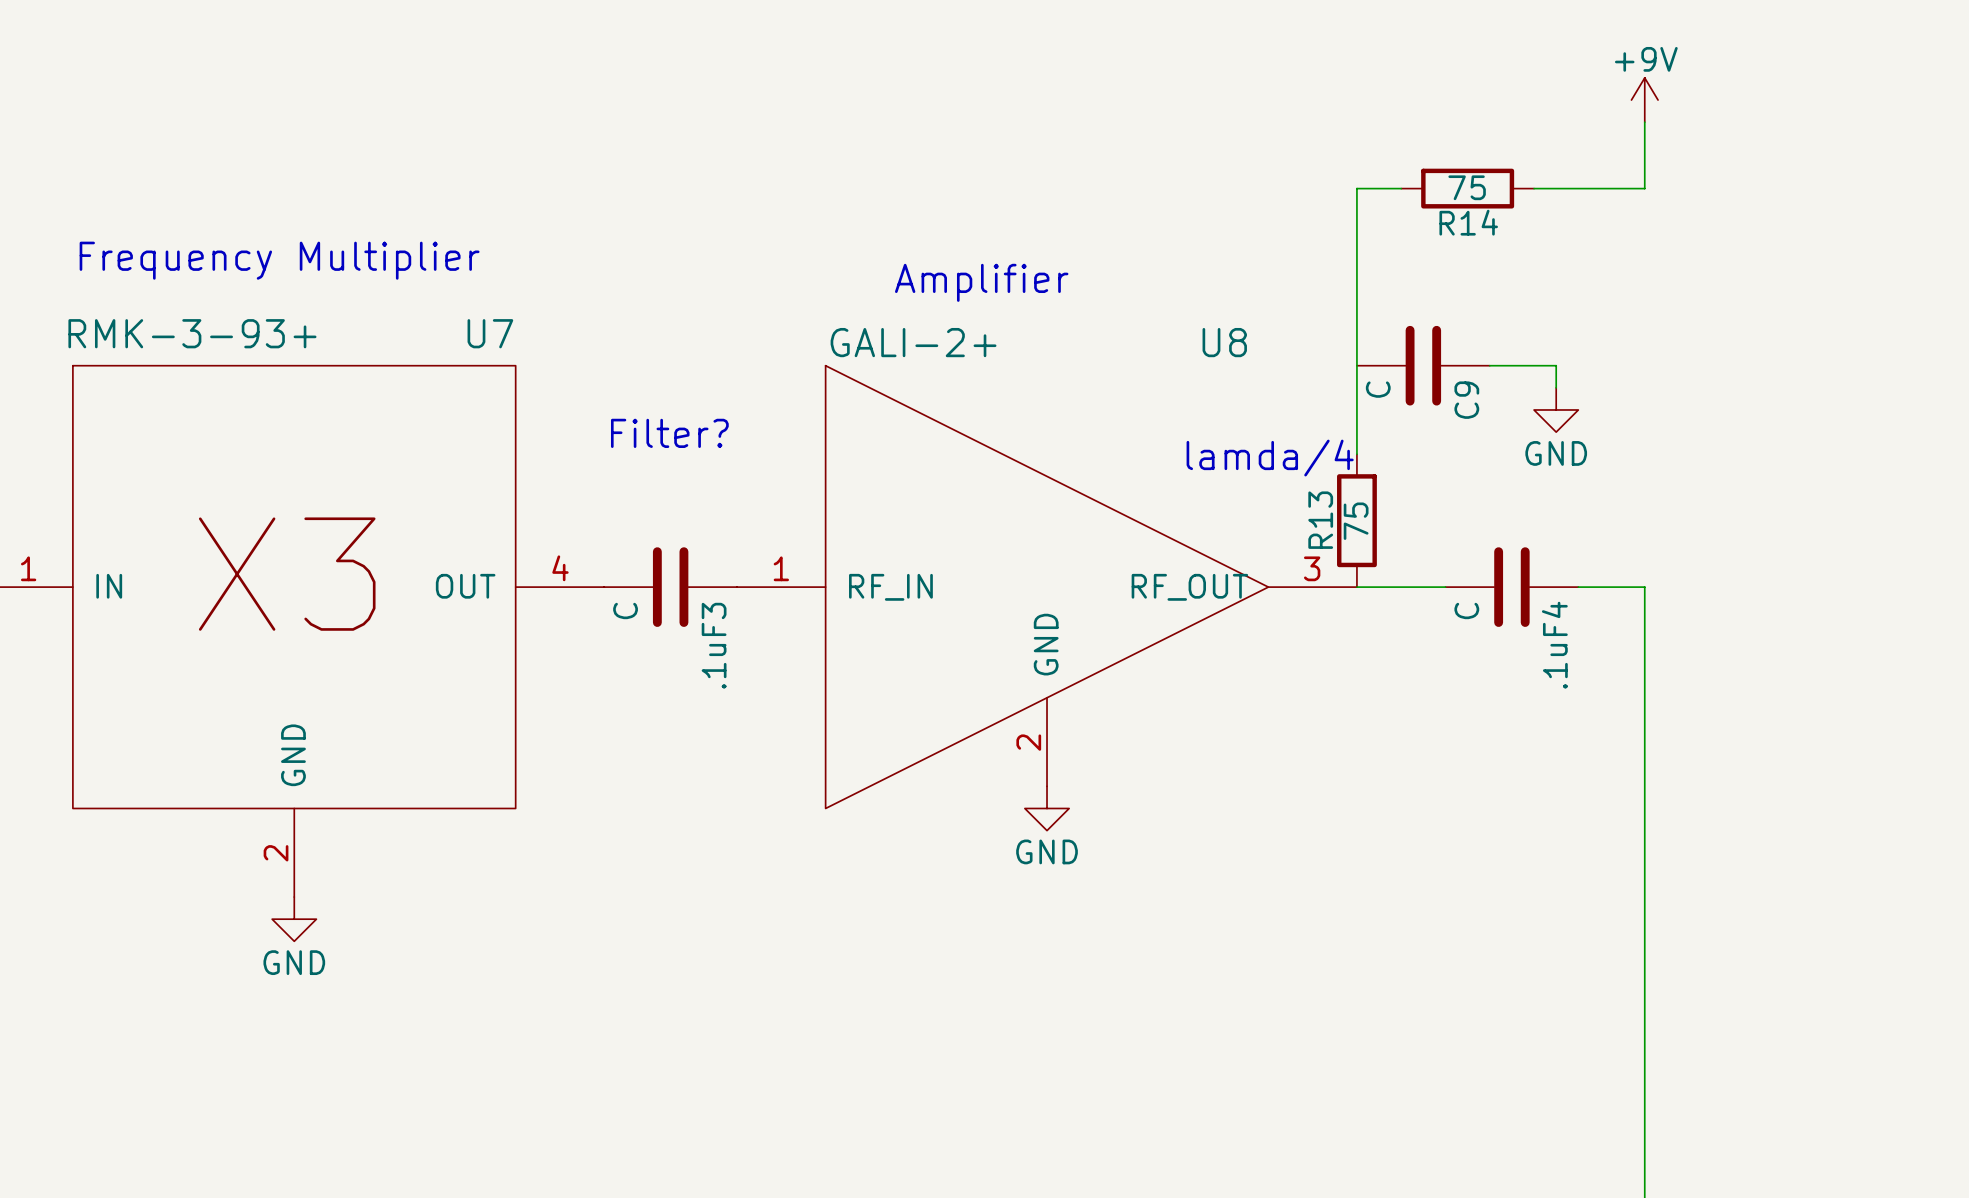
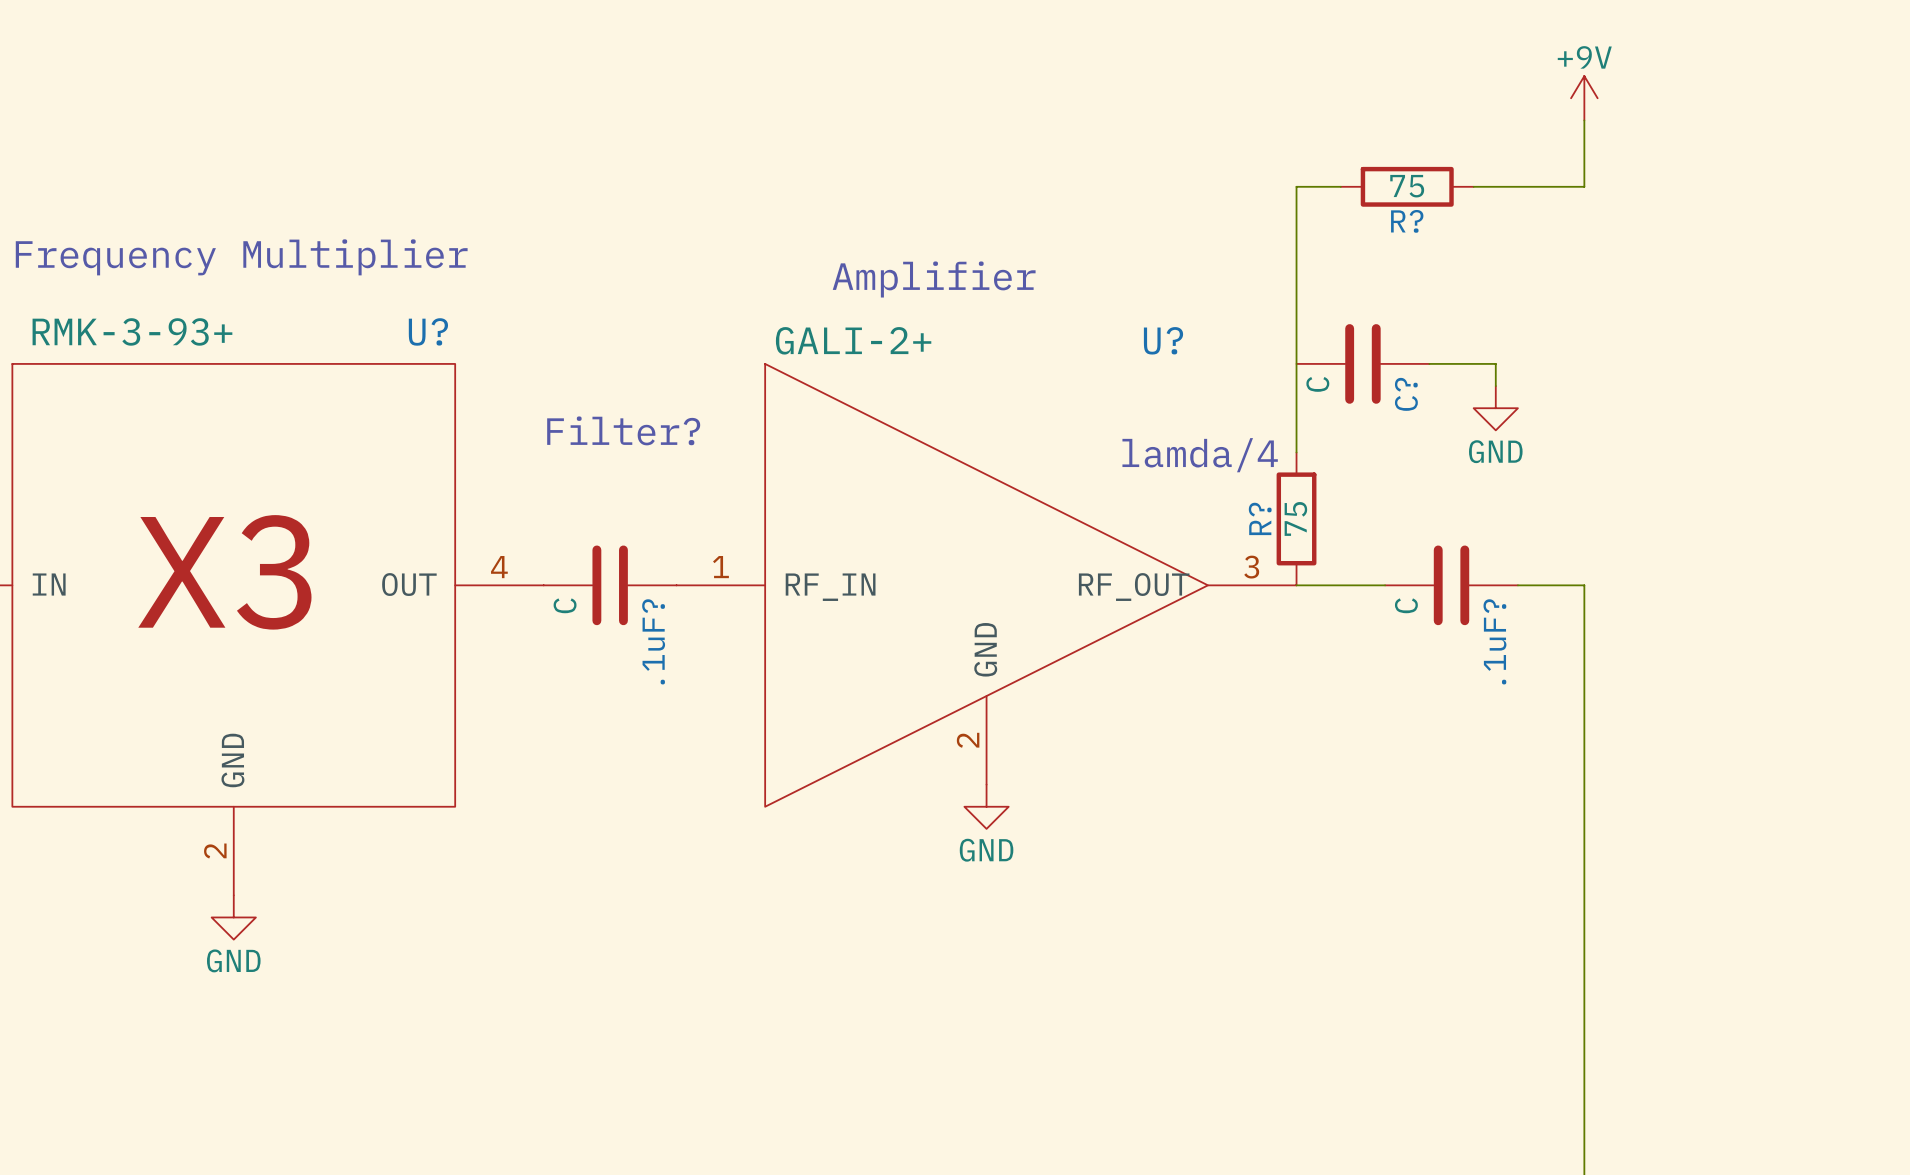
R14 name: R14 (1468, 222) -> R? (1407, 221)
U7 name: U7 (490, 333) -> U? (428, 331)
U8 name: U8 (1224, 342) -> U? (1163, 340)
C9 name: C9 (1466, 400) -> C? (1406, 394)
R13 name: R13 (1320, 520) -> R? (1260, 518)
.1uF3 name: .1uF3 (714, 645) -> .1uF? (653, 641)
.1uF4 name: .1uF4 (1554, 645) -> .1uF? (1494, 641)

